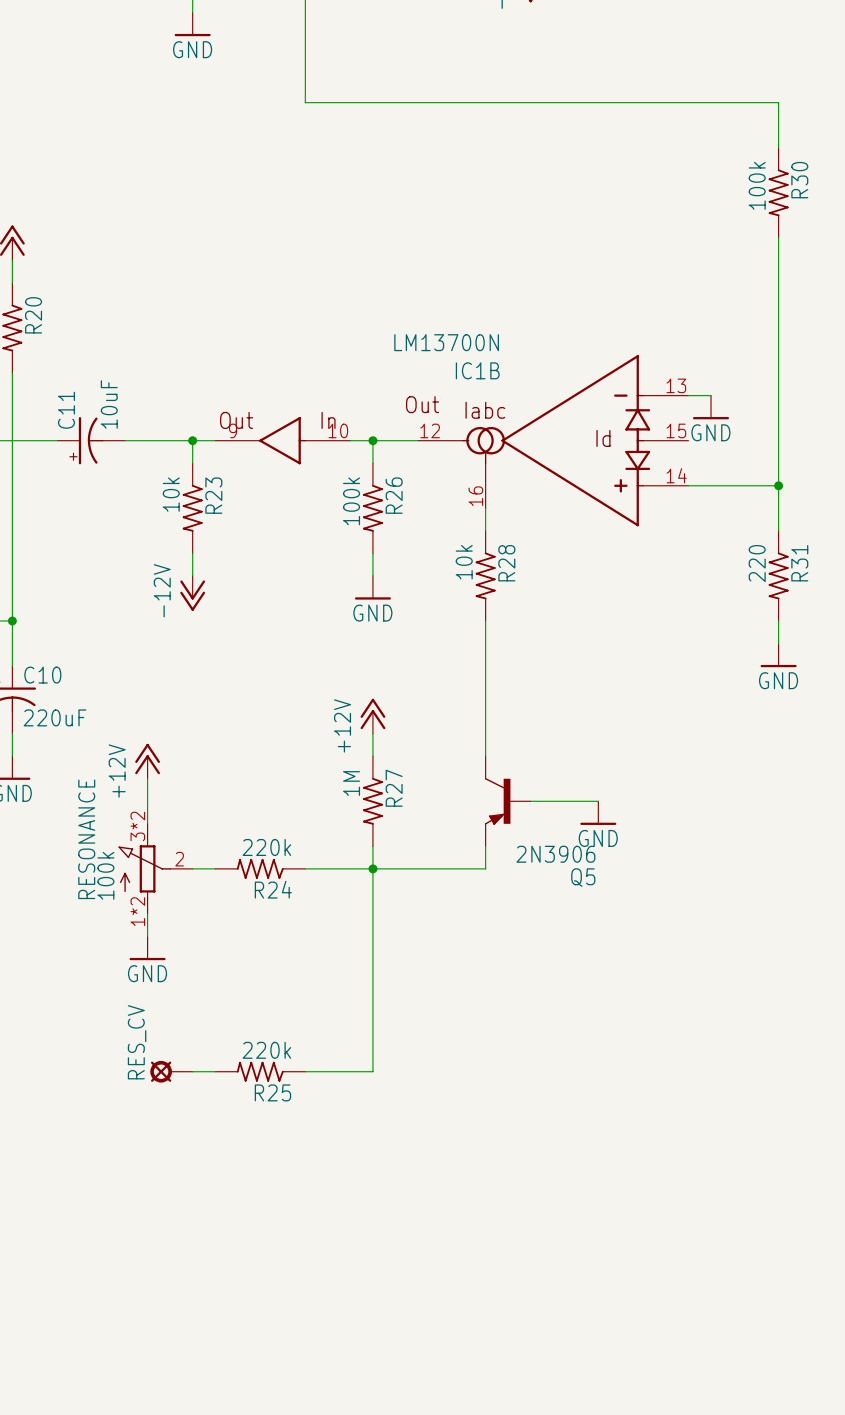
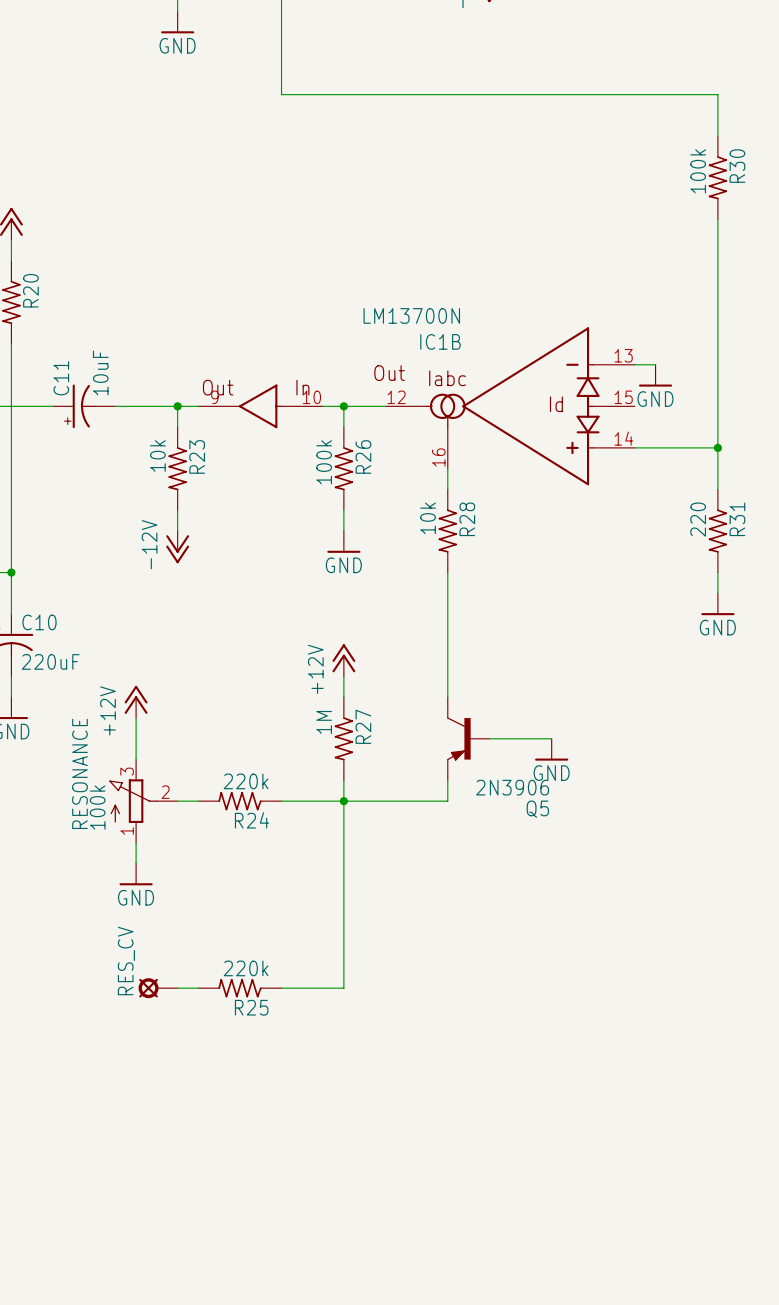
RESONANCE pin number: 3*2 (137, 826) -> 3 (127, 771)
RESONANCE pin number: 1*2 (137, 911) -> 1 (127, 830)

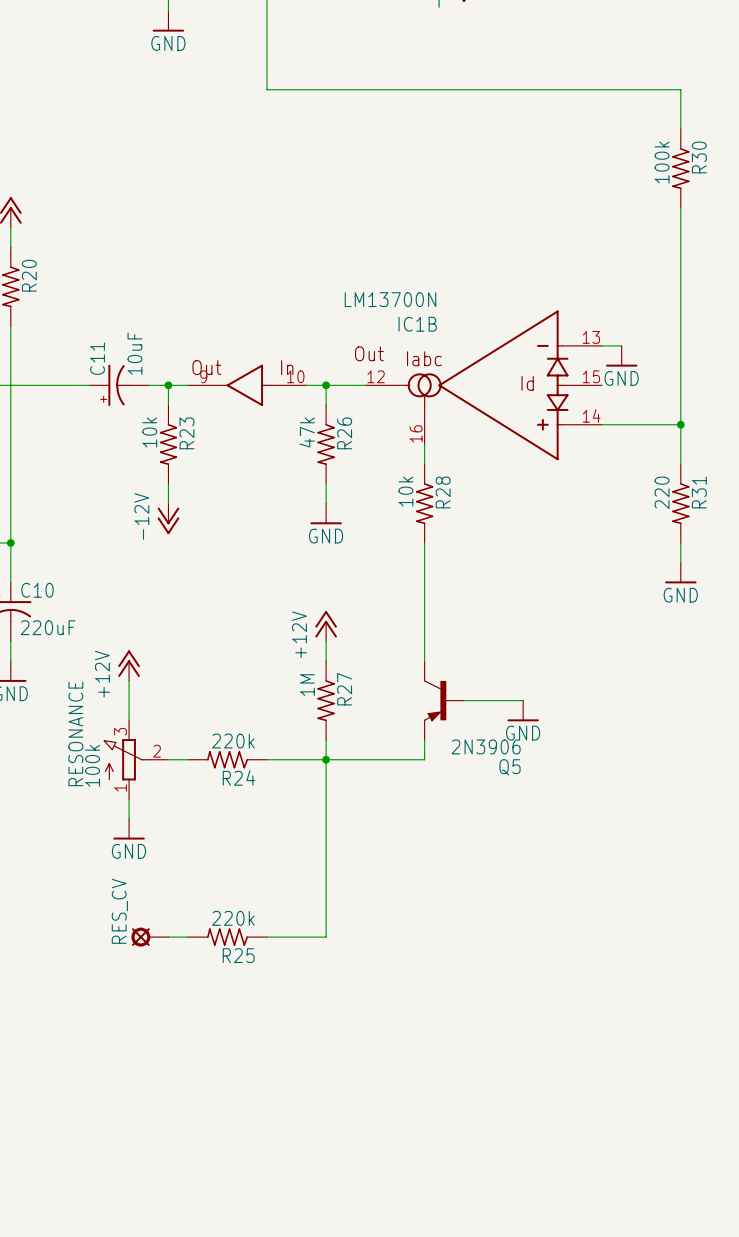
C11 position: (84, 406) -> (119, 385)
R26 value: 100k (324, 462) -> 47k (307, 432)

